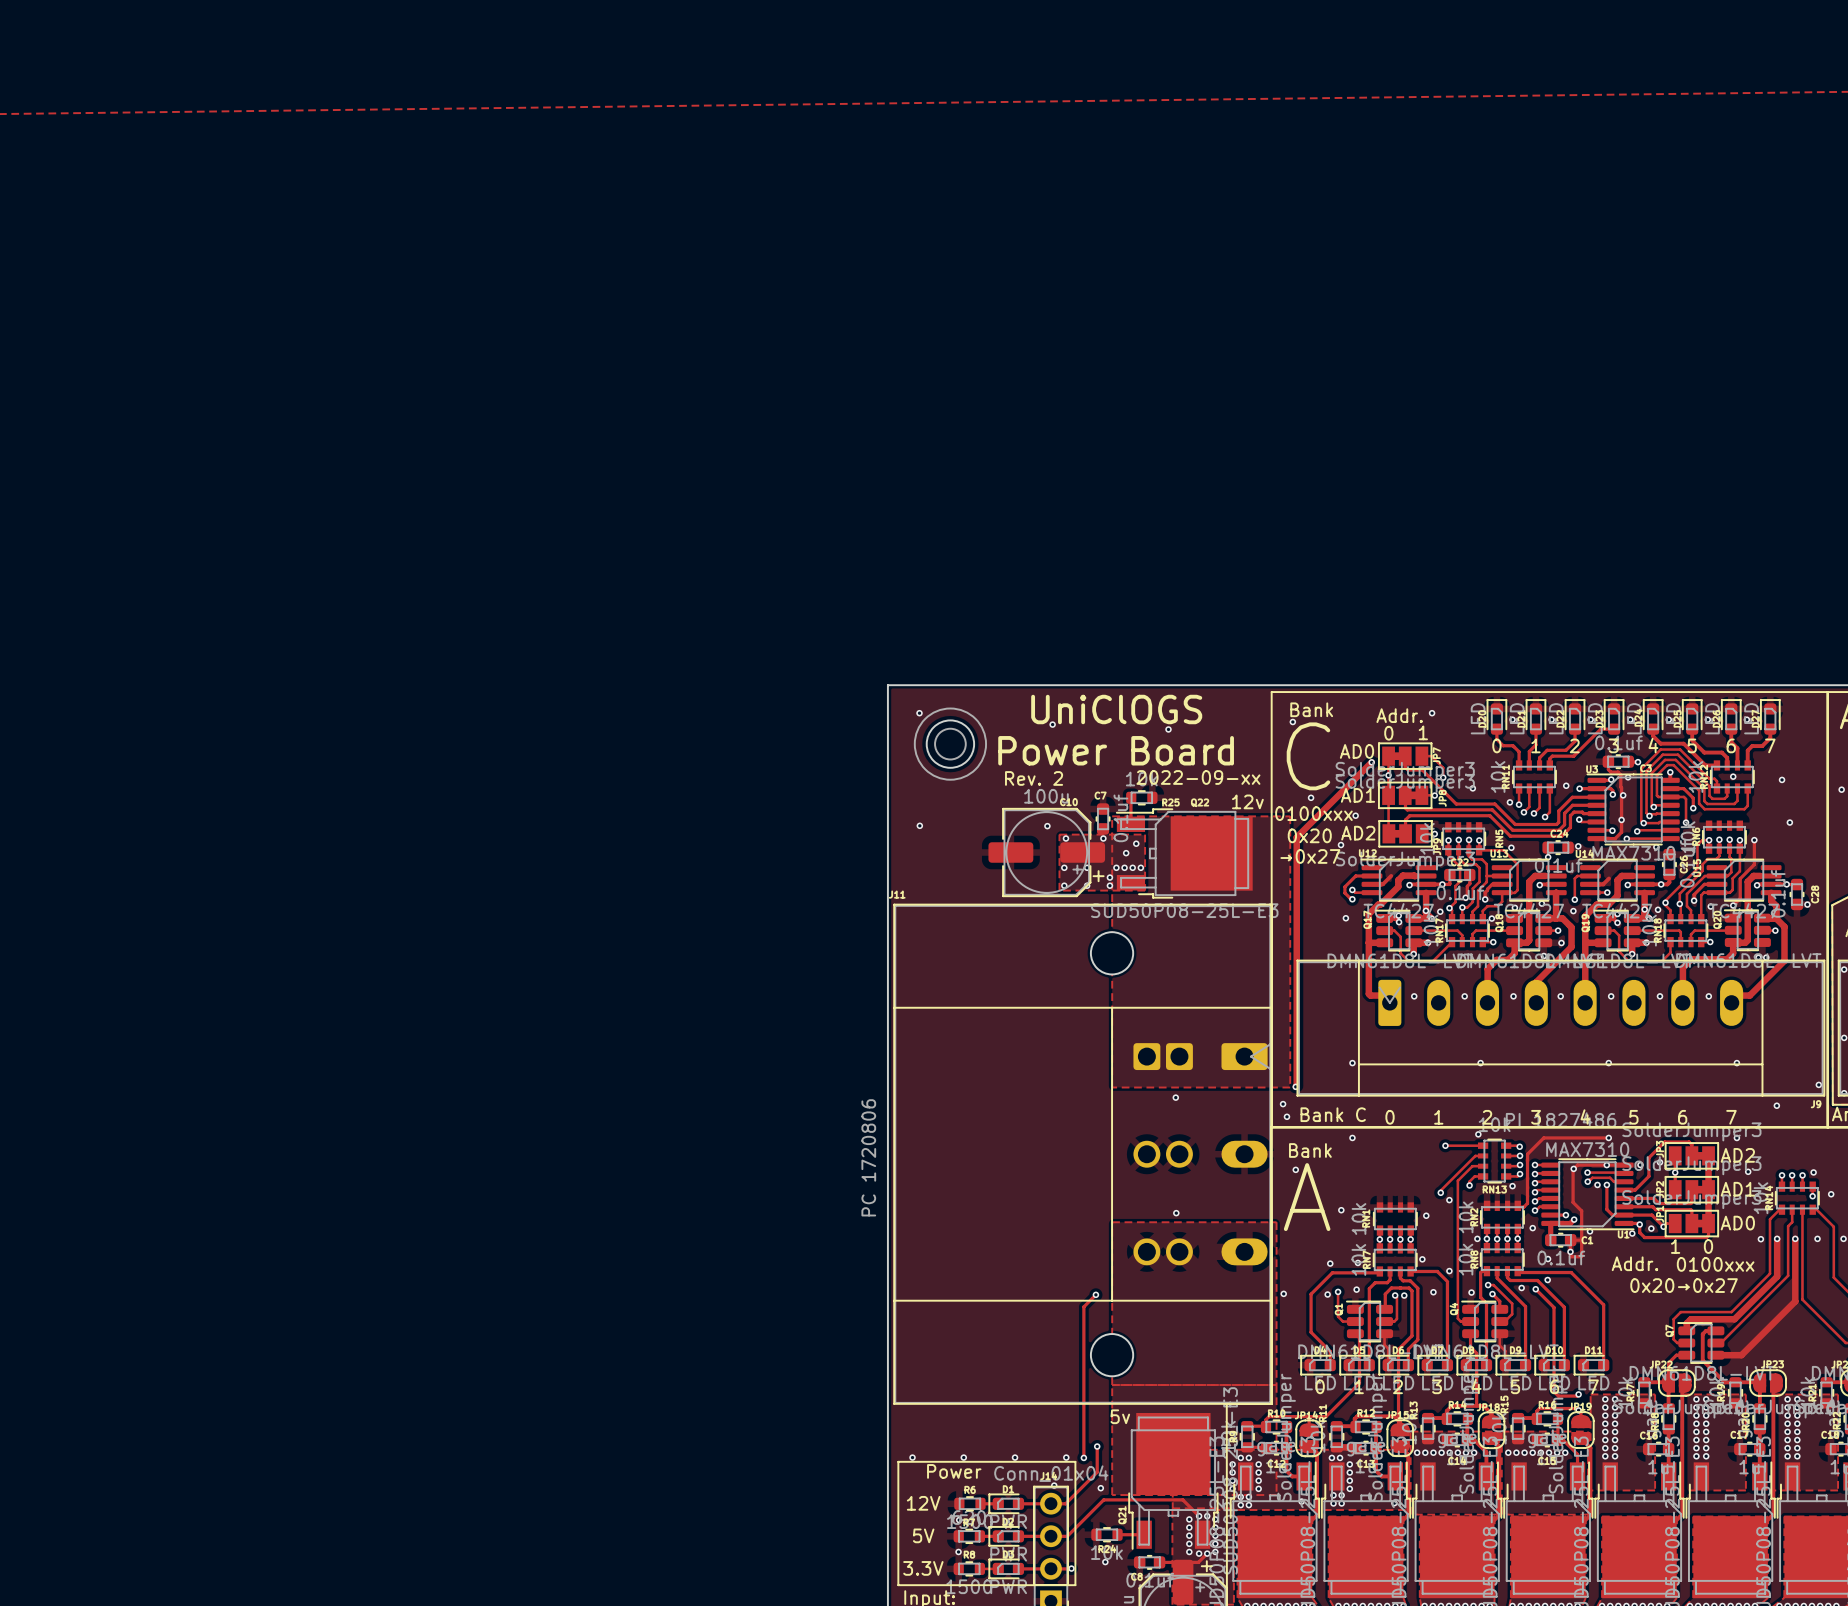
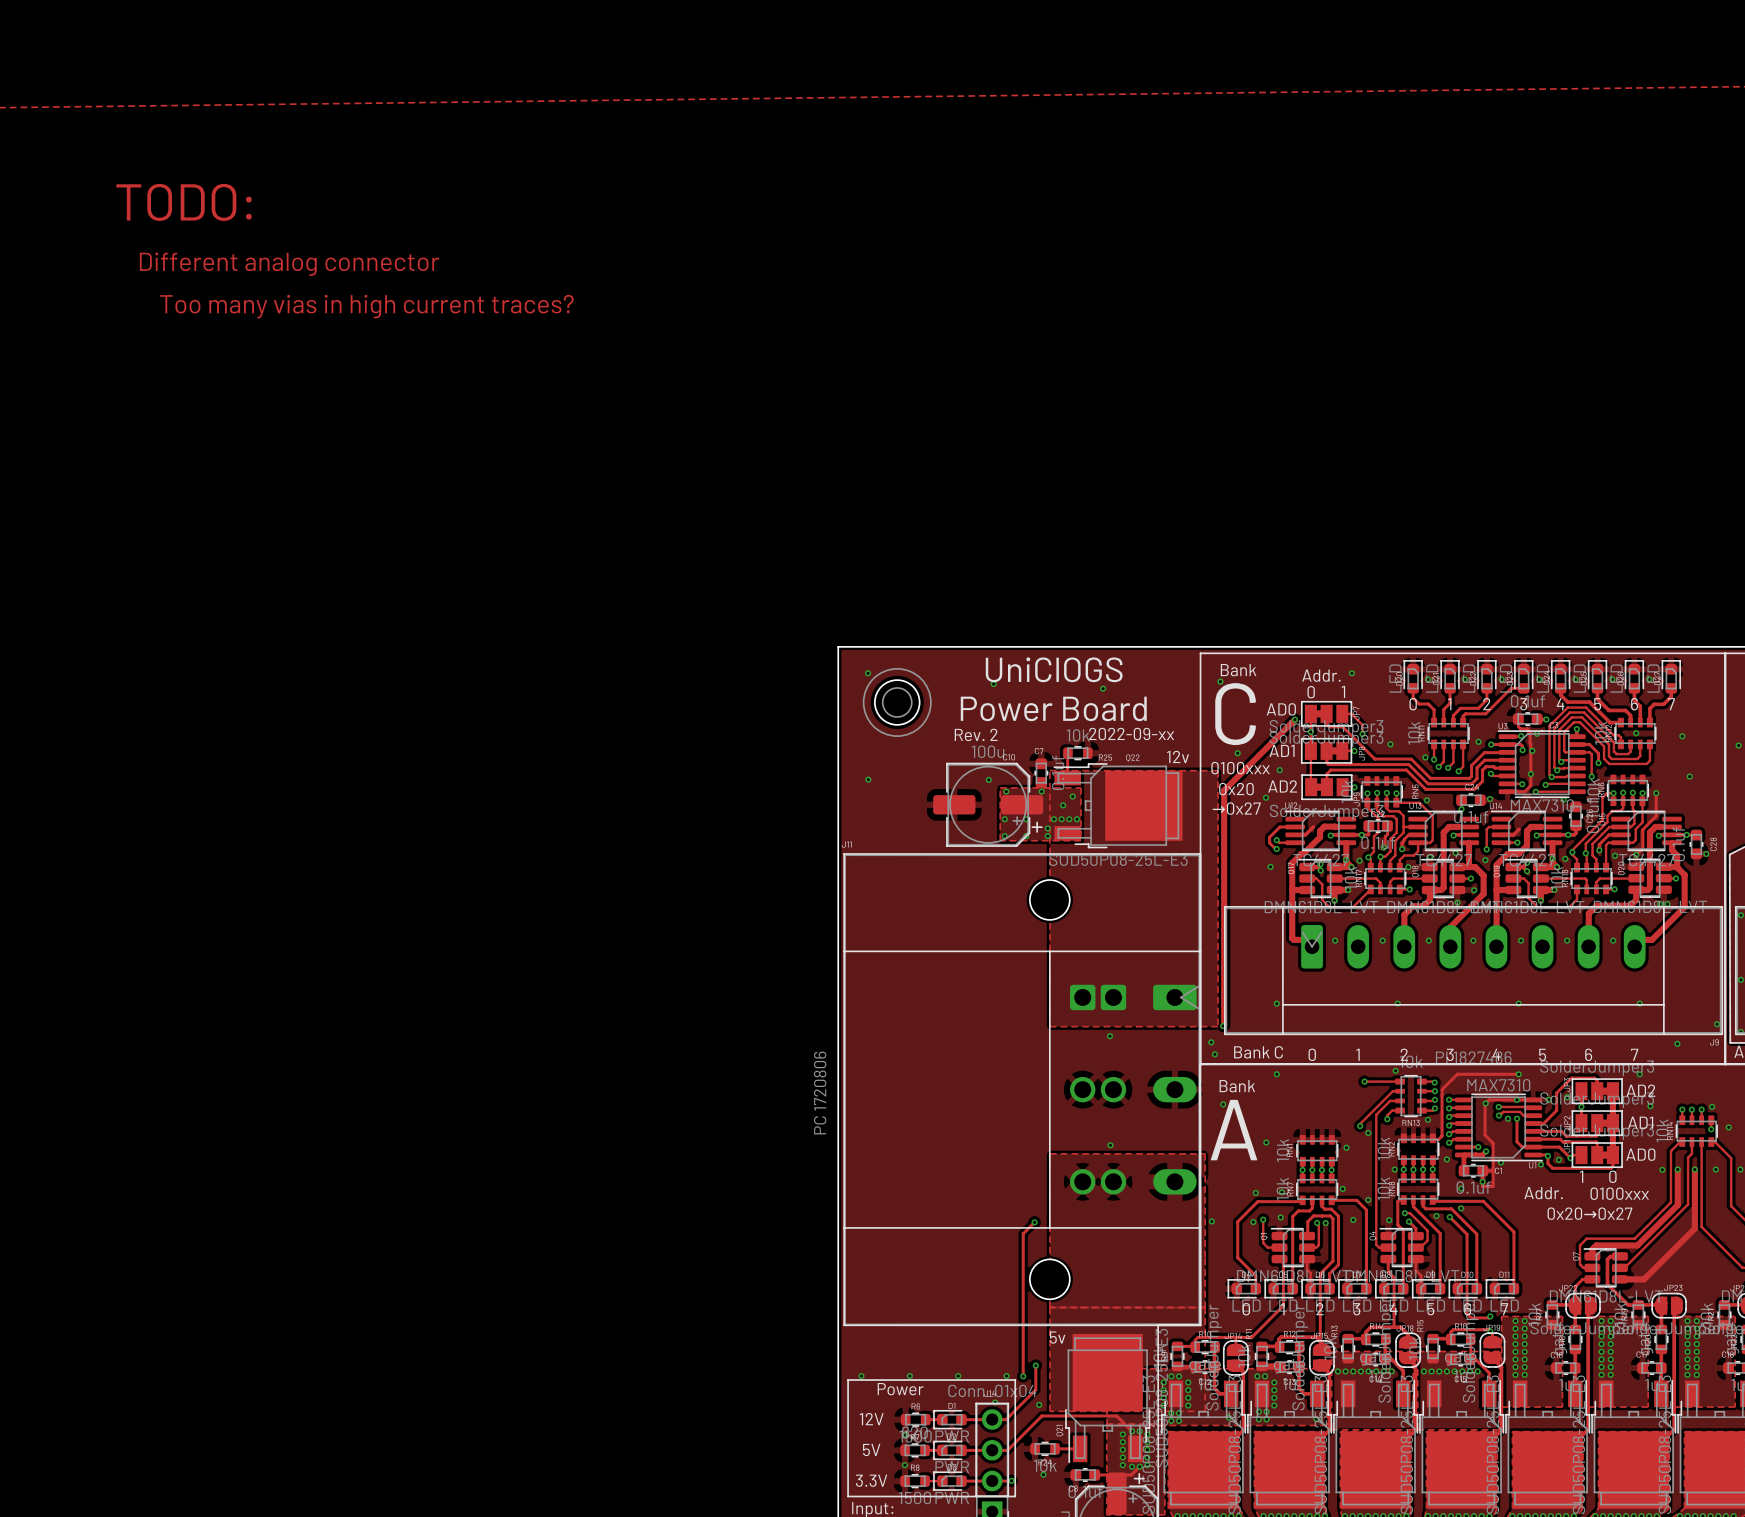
text: none -> TODO: (184, 202)
text: none -> Different analog connector (289, 264)
text: none -> Too many vias in high current traces? (366, 306)

